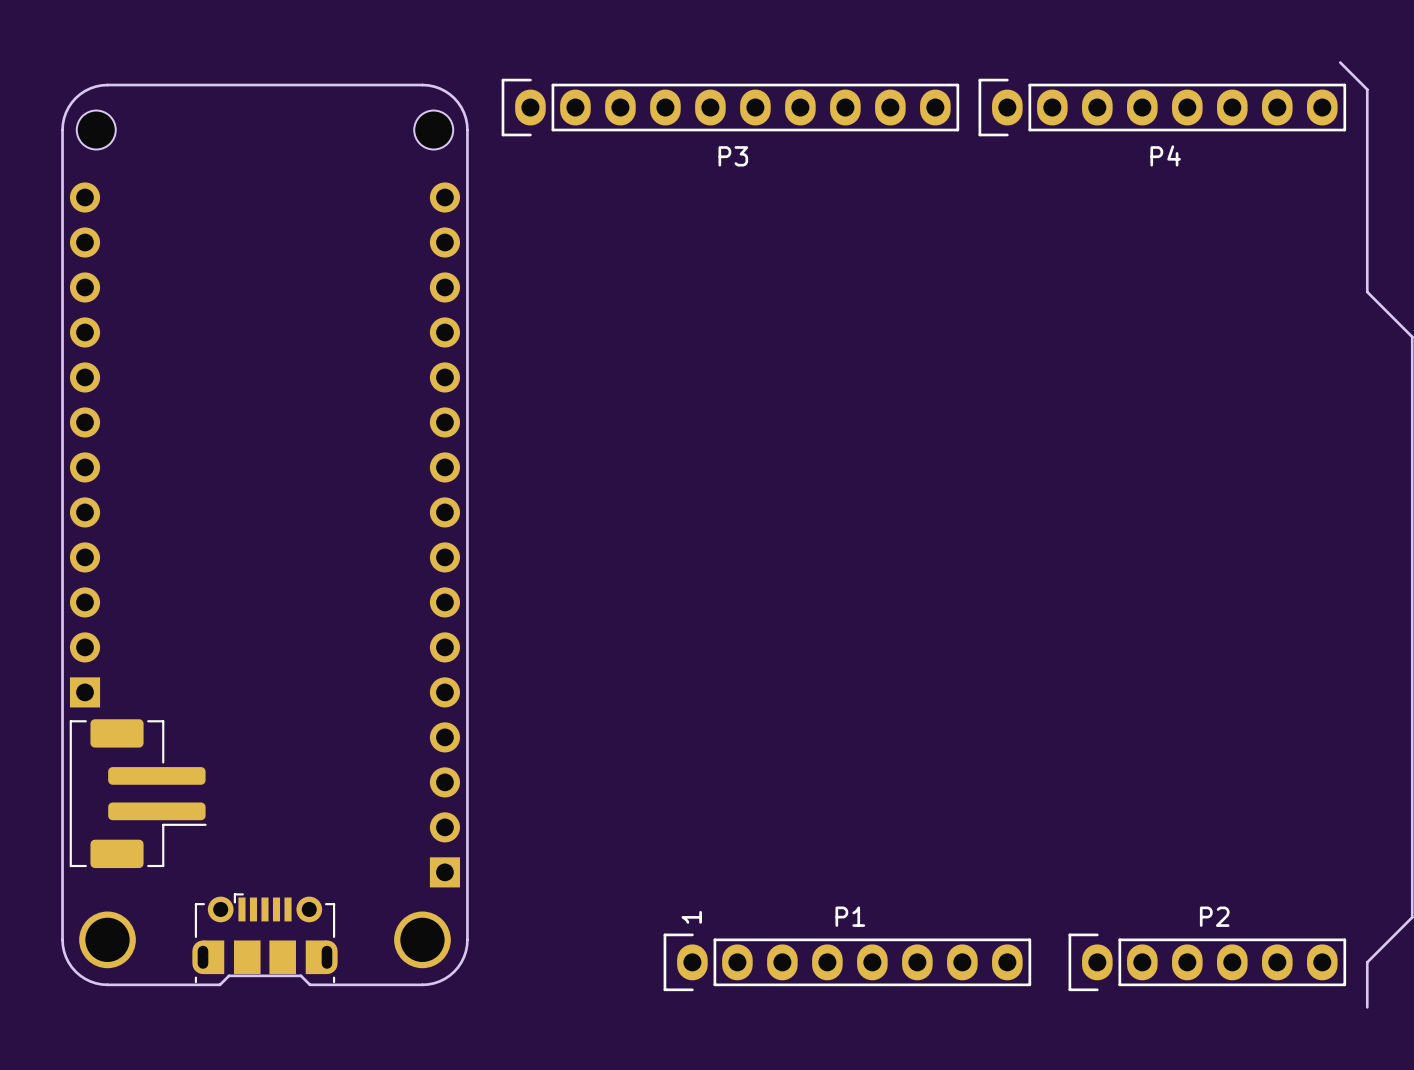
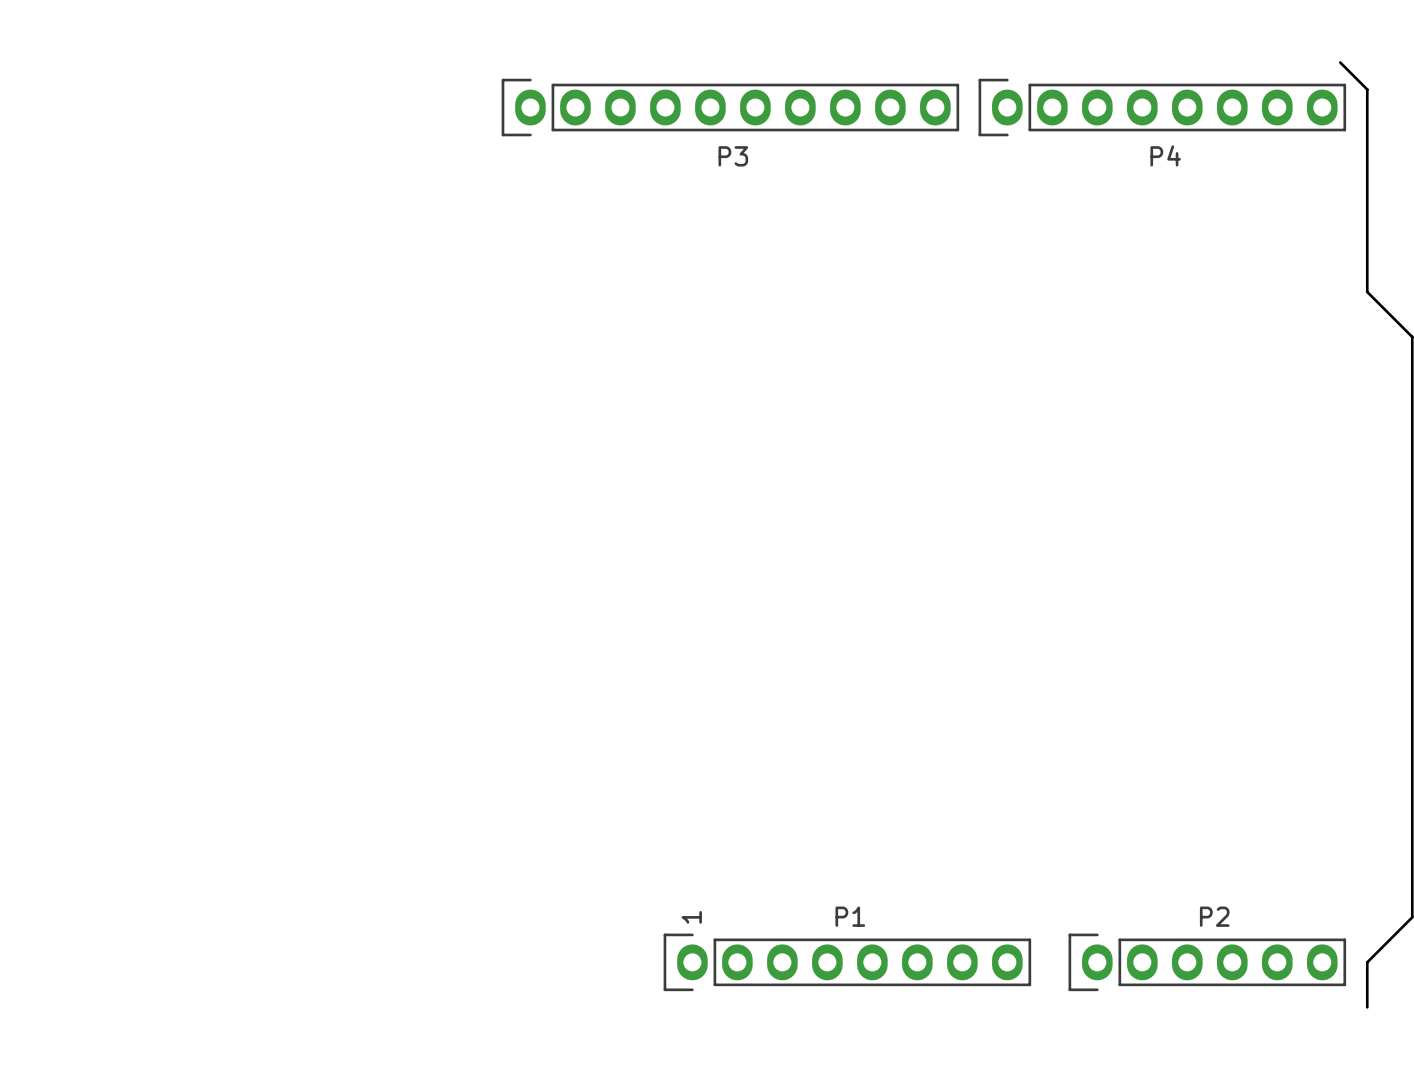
board edge: (107, 85) (428, 85) (439, 88) (449, 94) (458, 102) (464, 112) (467, 130) (467, 939) (465, 951) (461, 962) (454, 971) (439, 981) (422, 984) (309, 984) (300, 975) (228, 975) (220, 984) (107, 984) (95, 983) (85, 978) (75, 971) (65, 957) (62, 939) (62, 130) (65, 112) (75, 98) (90, 88) (107, 85) -> none
part: (96, 130) -> none
part: (433, 130) -> none
part: (85, 444) -> none
part: (444, 534) -> none
part: (138, 793) -> none
part: (264, 938) -> none
part: (107, 939) -> none
part: (422, 939) -> none

